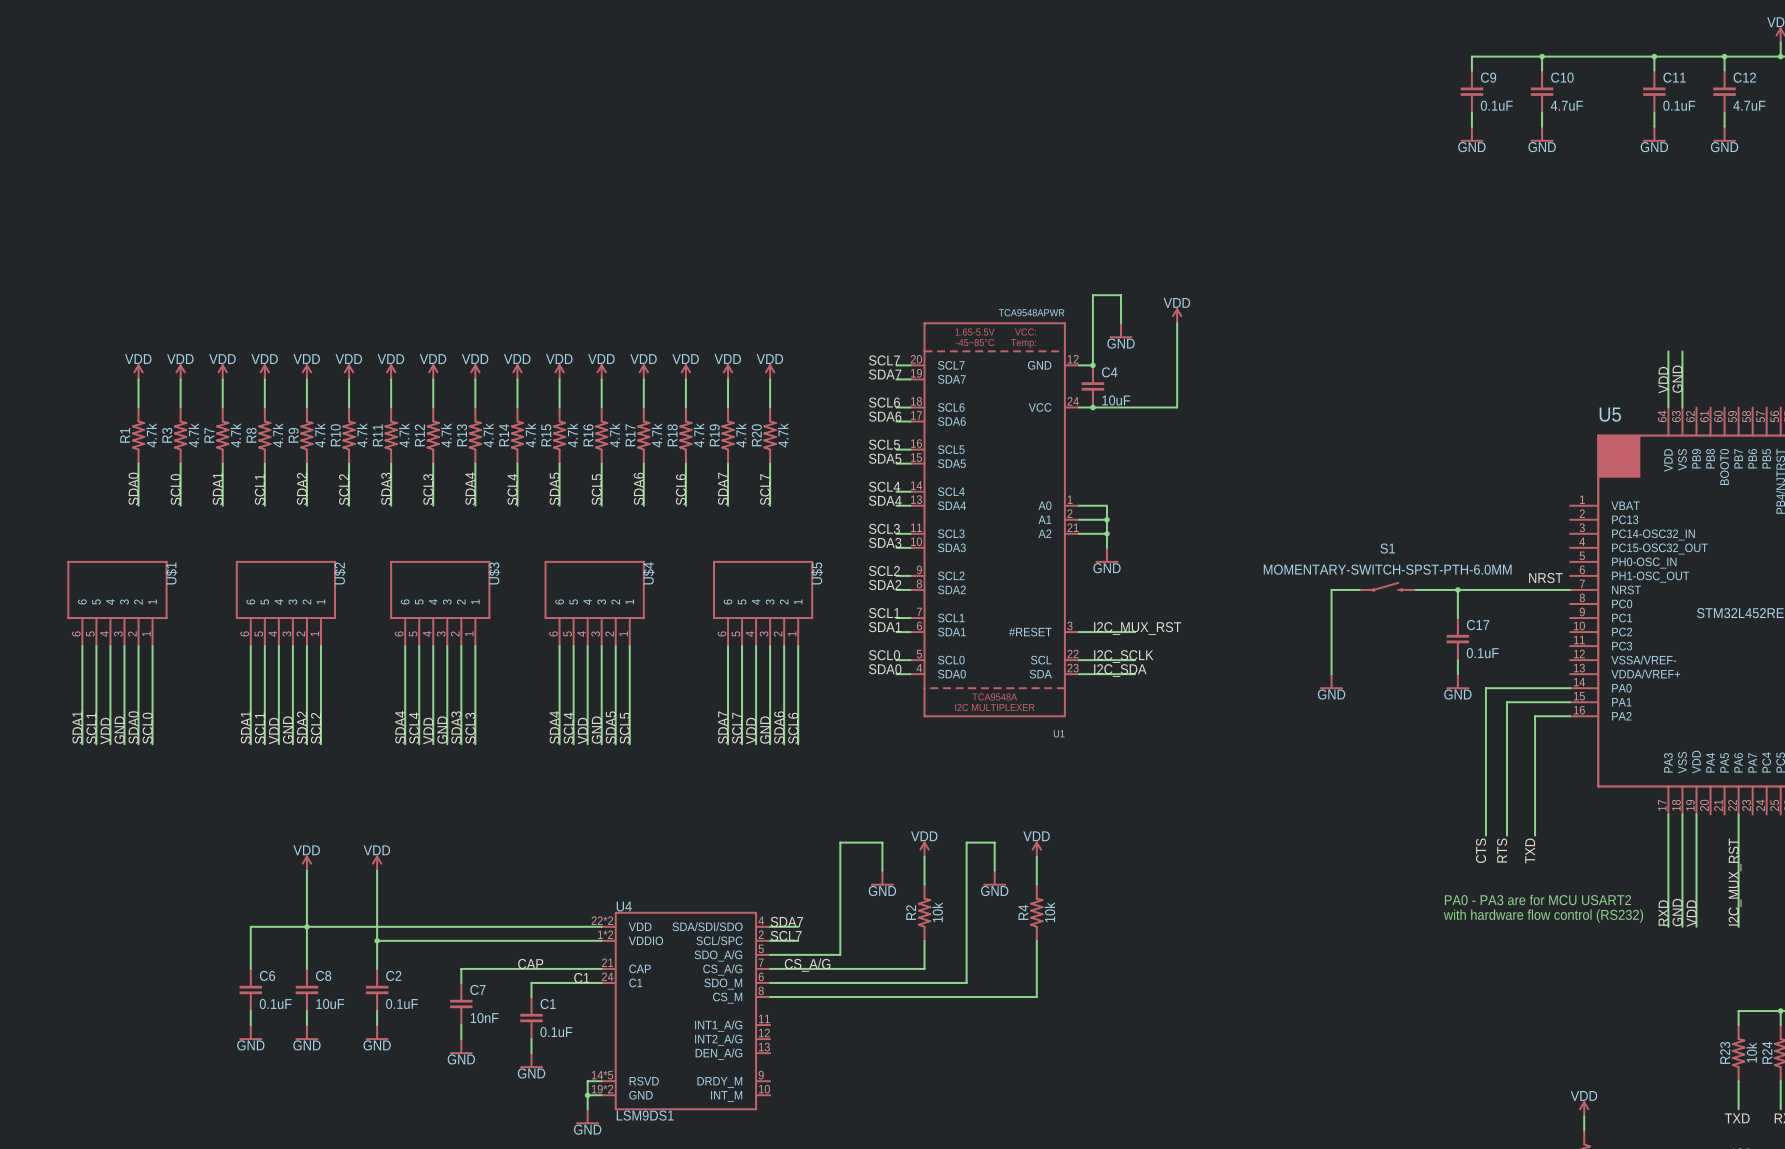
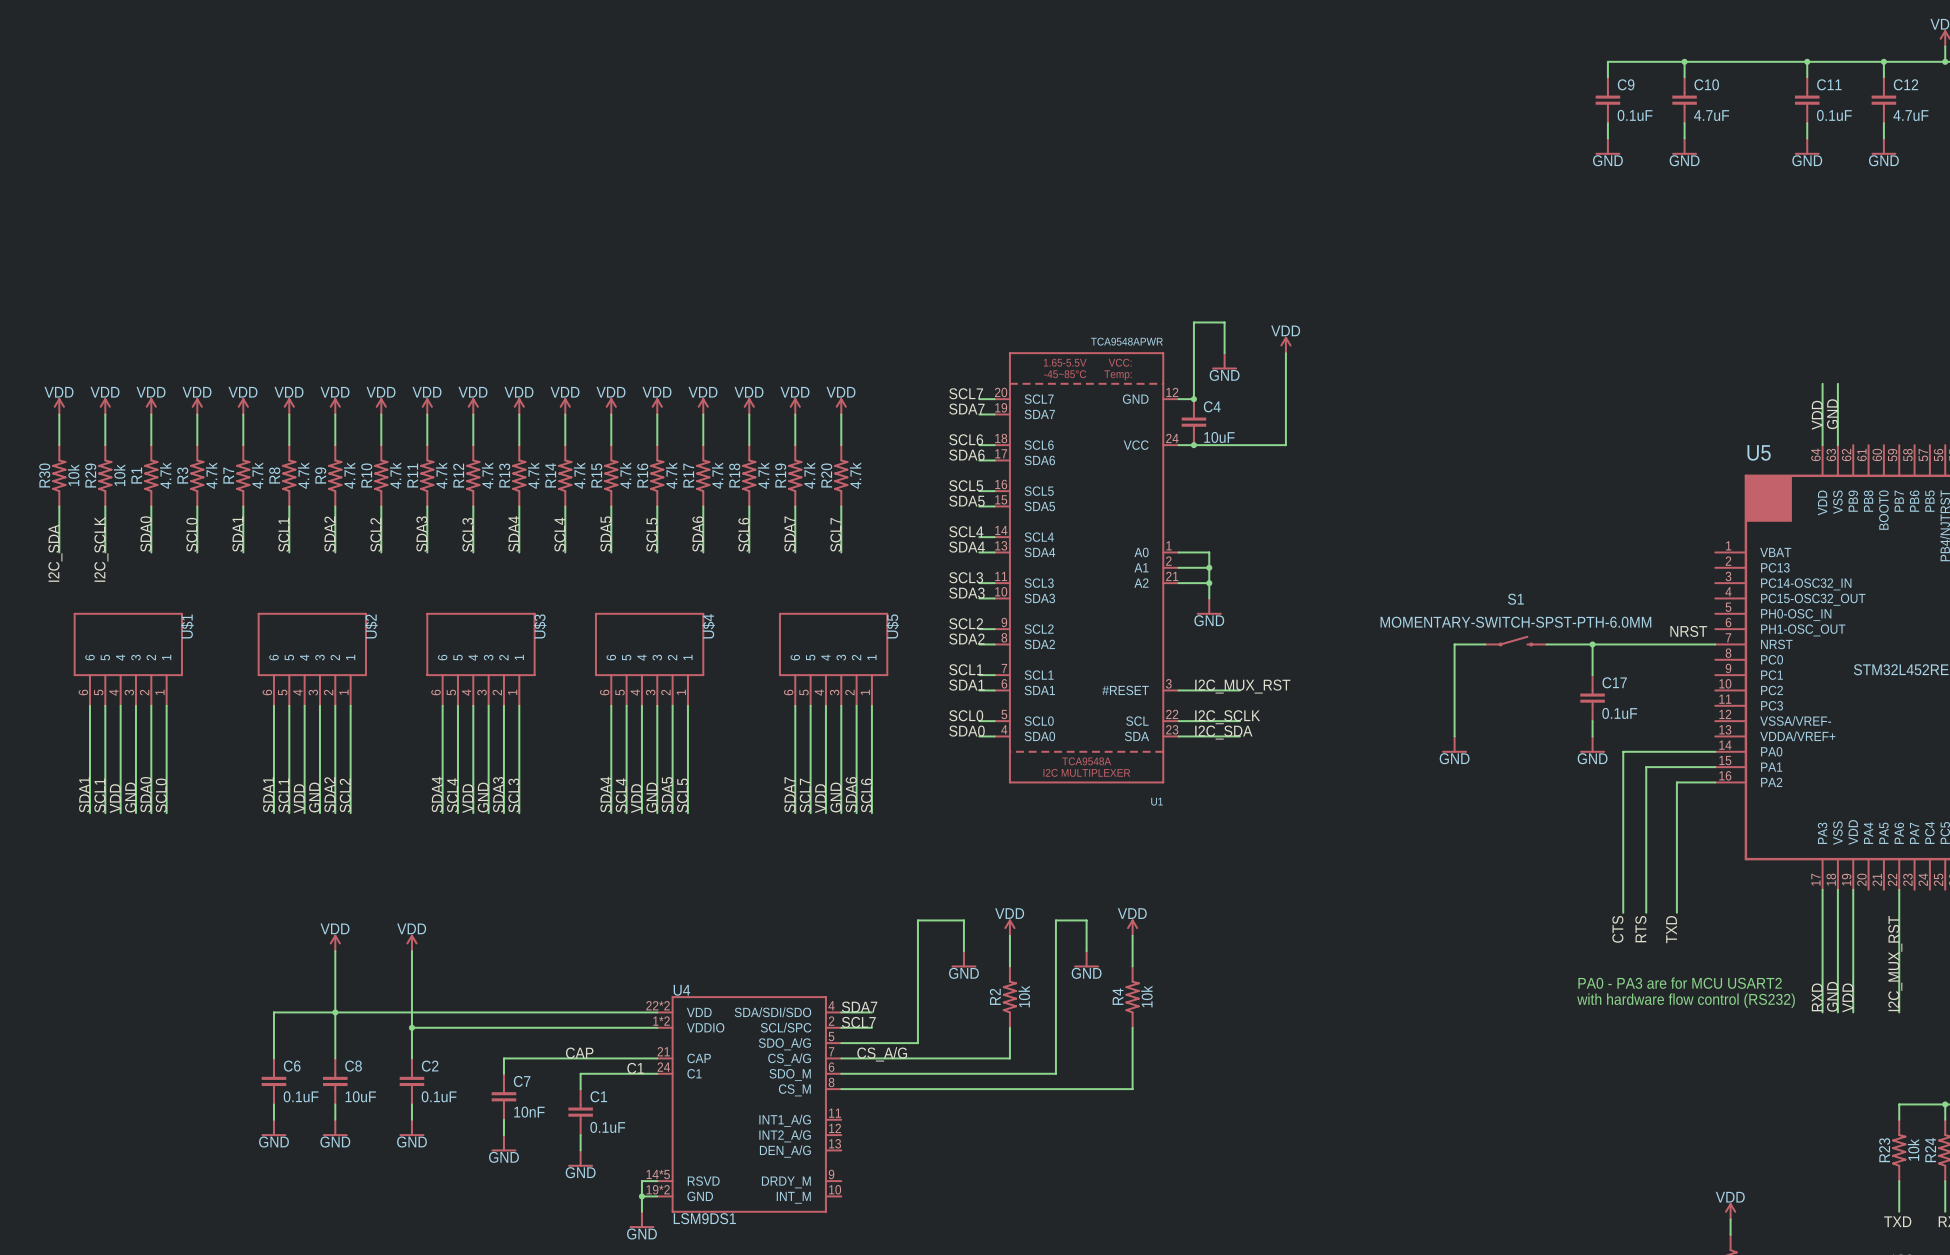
power symbol: none -> VDD (59, 406)
power symbol: none -> VDD (105, 406)
wire: none -> (59, 414) (59, 445)
wire: none -> (105, 414) (105, 445)
R30: none -> 10k (59, 475)
R29: none -> 10k (105, 475)
wire: none -> (59, 506) (59, 552)
wire: none -> (105, 506) (105, 552)
label: none -> I2C_SCLK (101, 549)
label: none -> I2C_SDA (55, 553)

